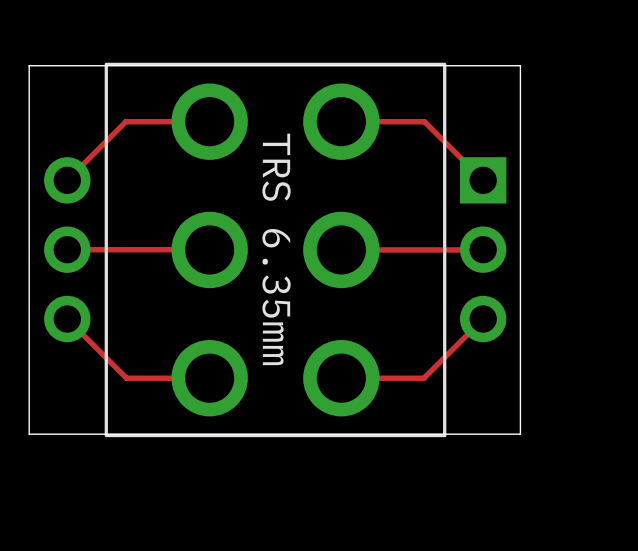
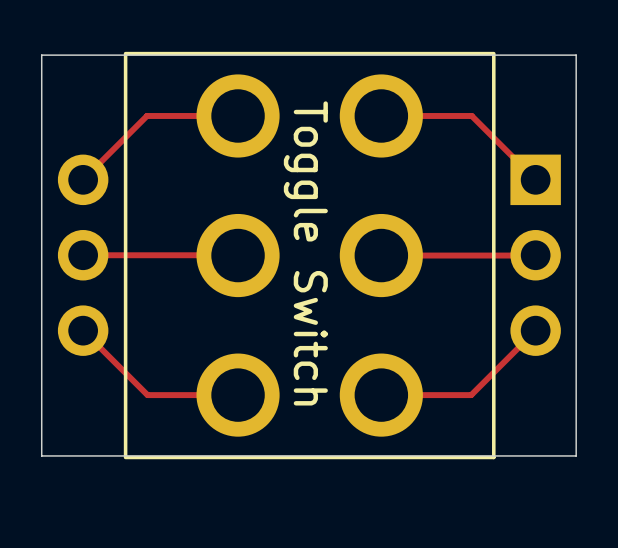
text: TRS 6.35mm (276, 249) -> Toggle Switch (305, 253)

